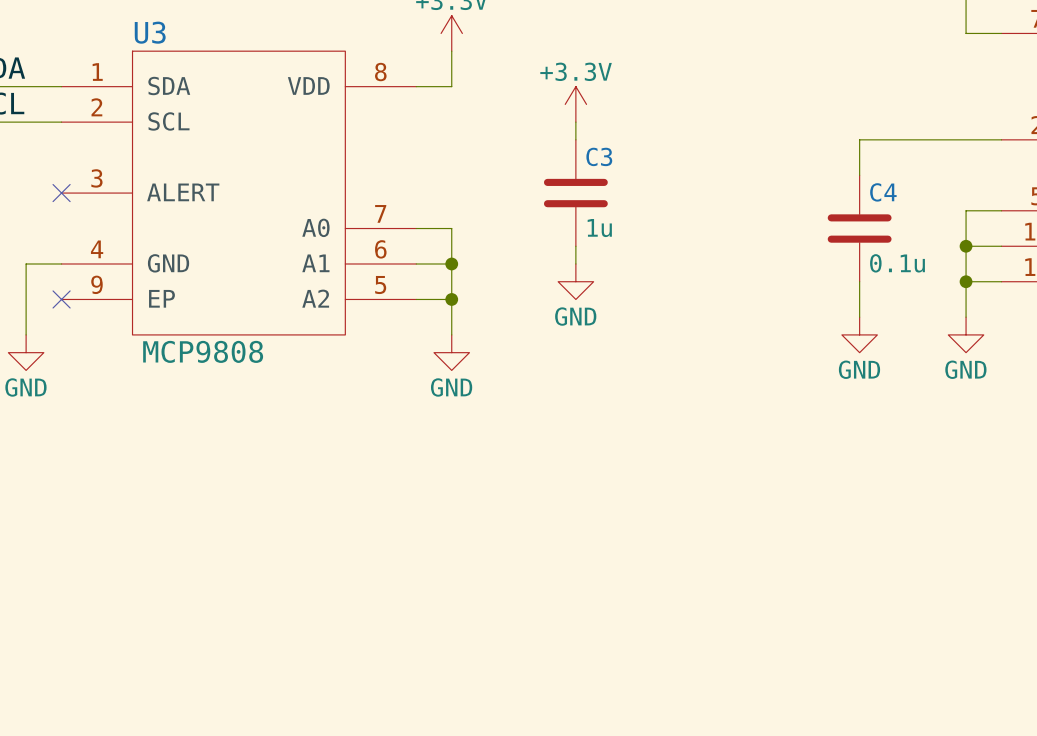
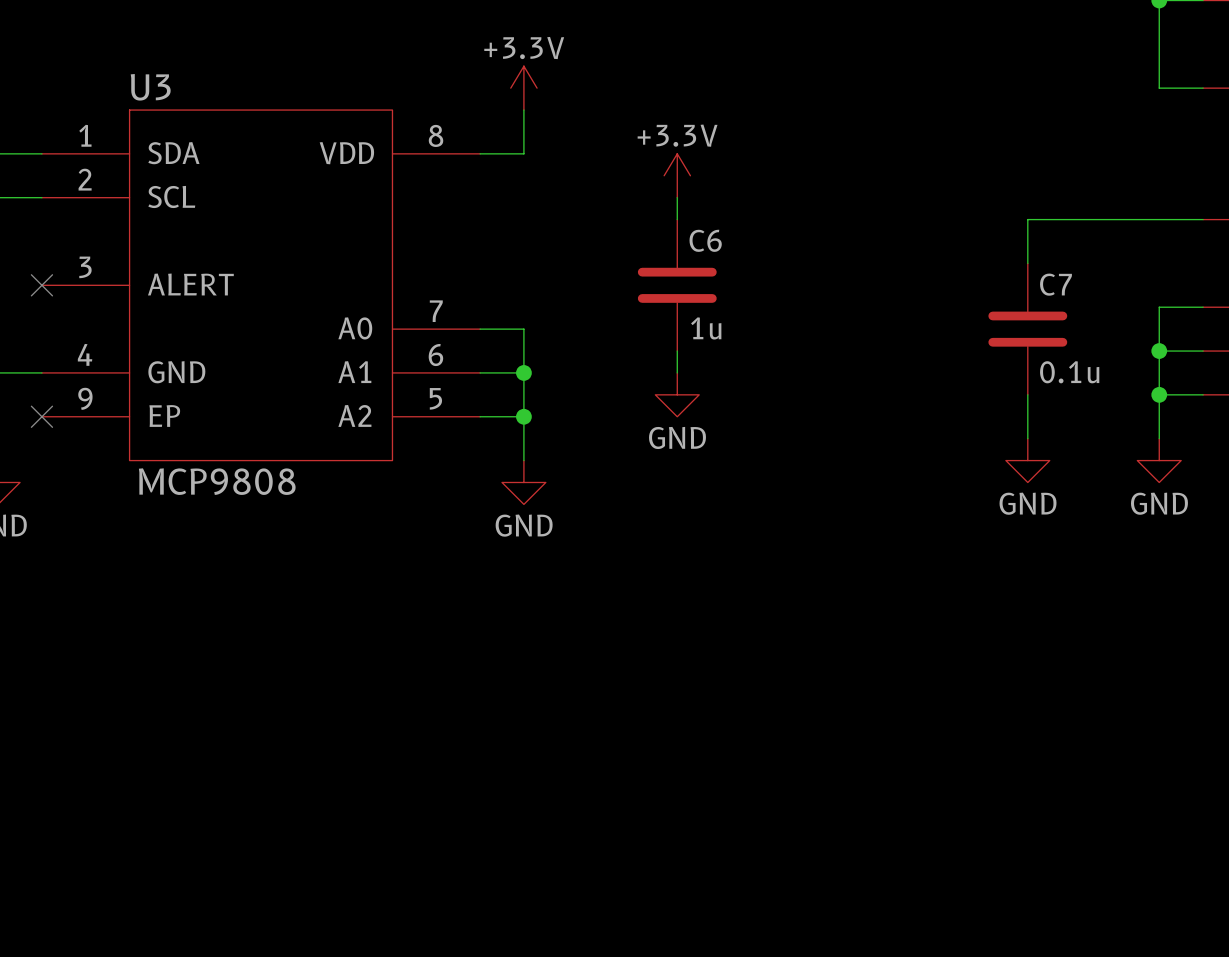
C3 name: C3 (599, 156) -> C6 (705, 240)
C4 name: C4 (883, 192) -> C7 (1055, 284)

